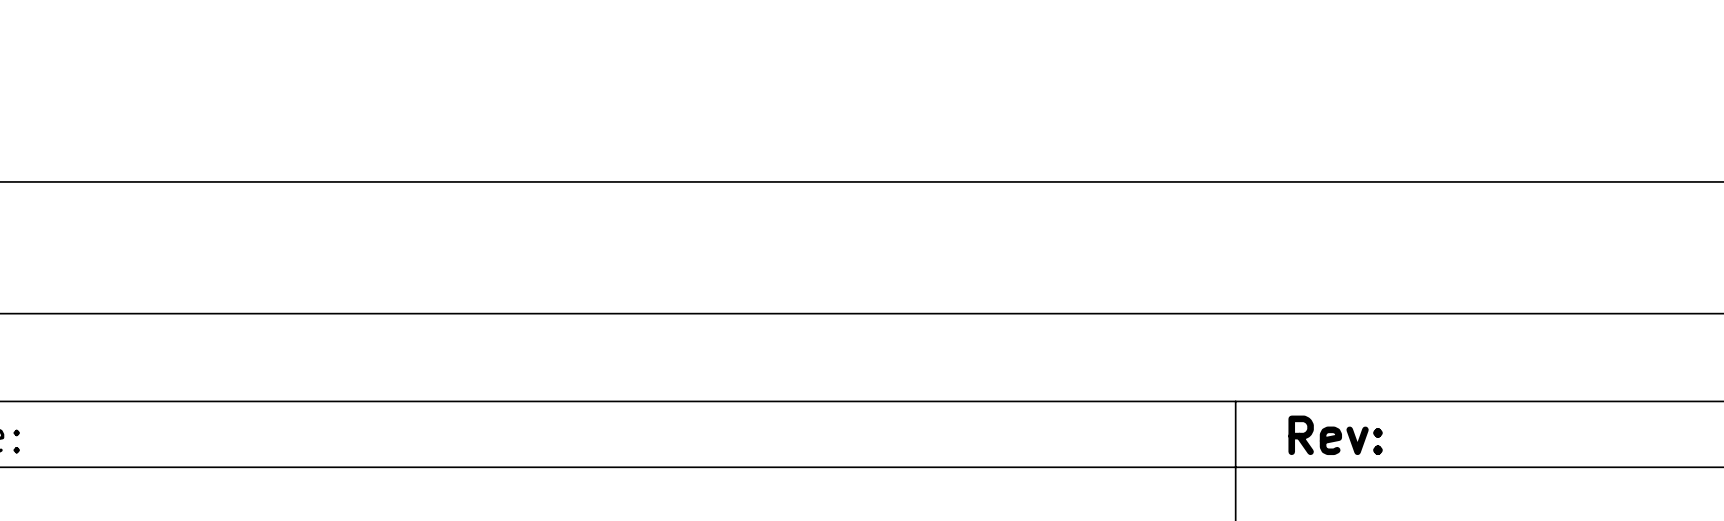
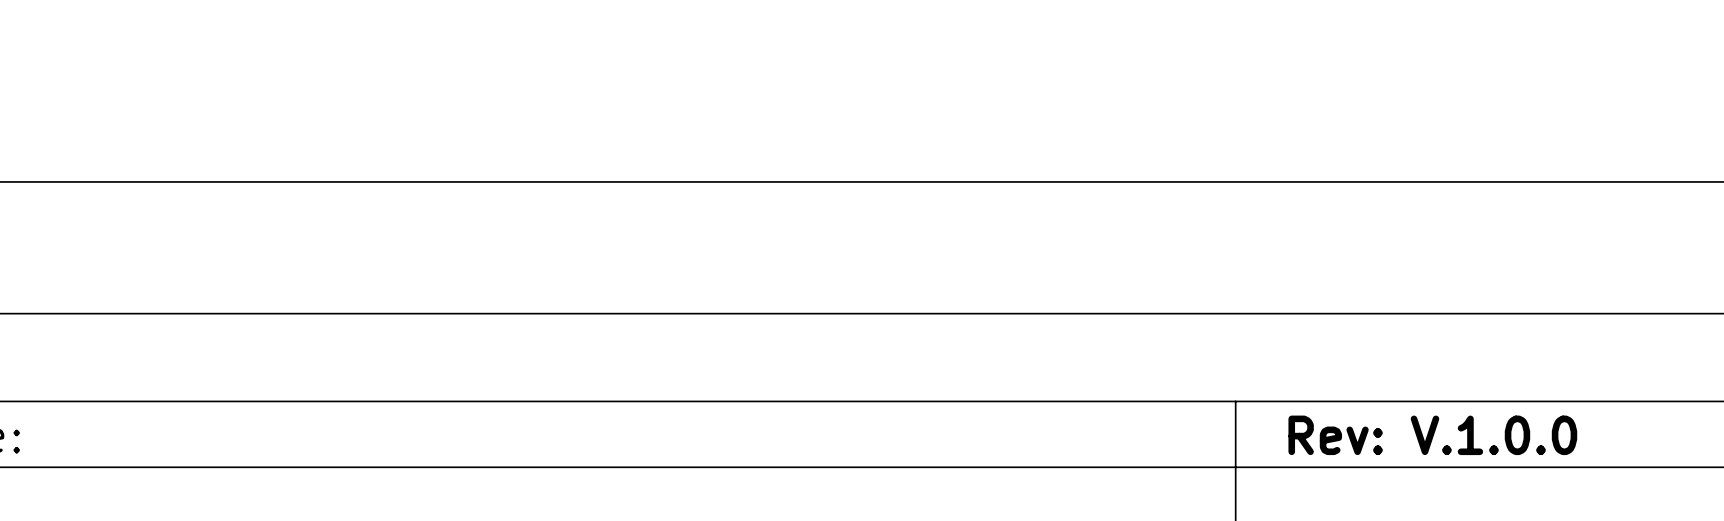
title block: Rev: (1335, 435) -> Rev: V.1.0.0 (1432, 435)

